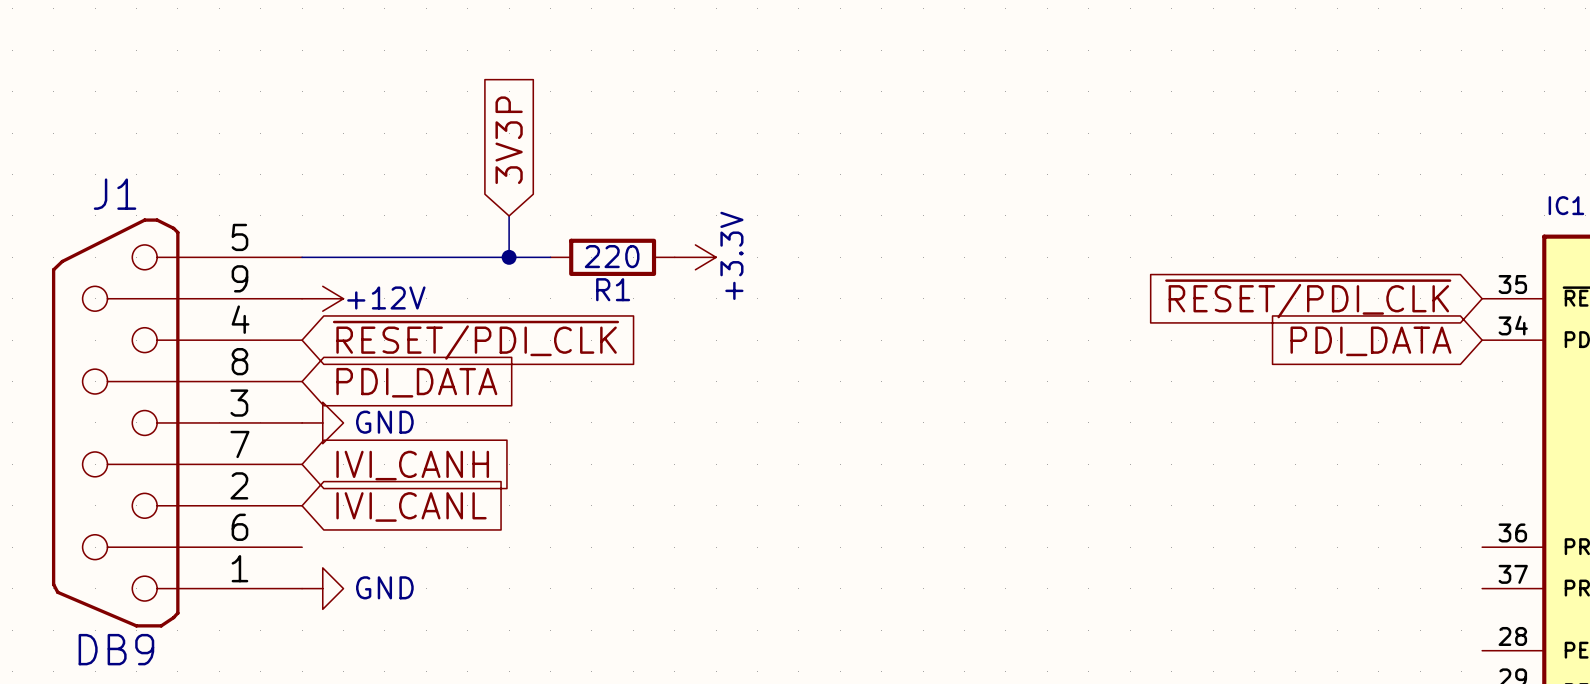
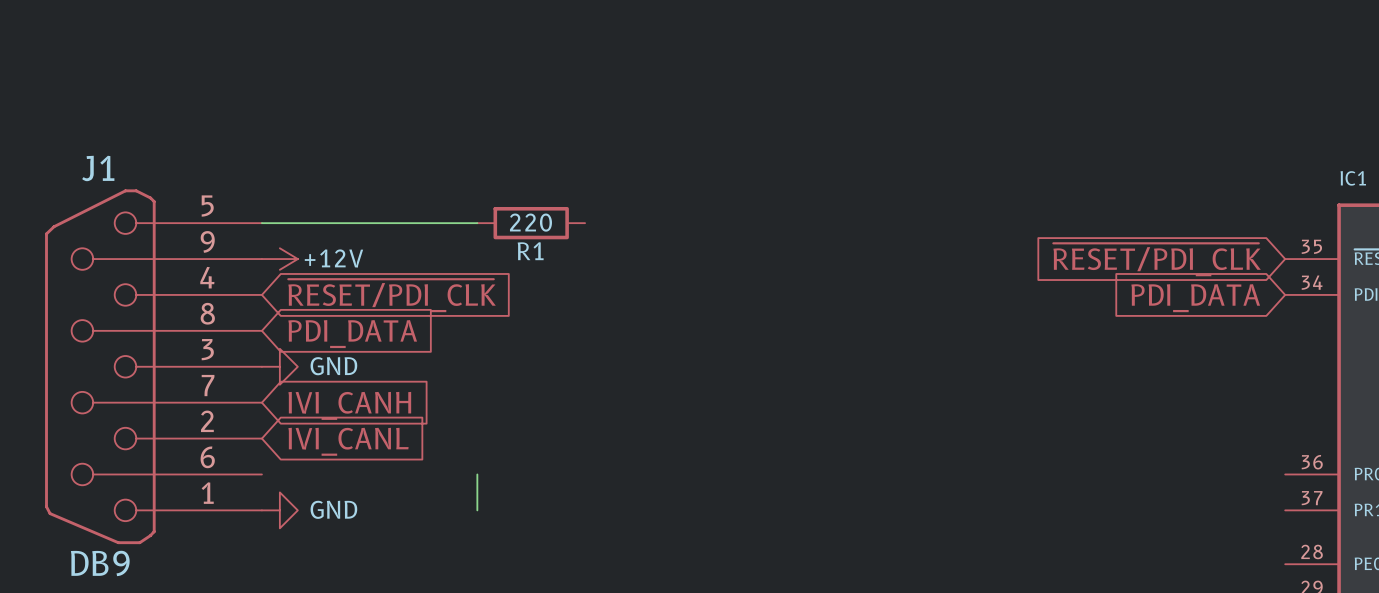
global label: 3V3P (509, 140) -> none
wire: (509, 215) (509, 257) -> (477, 474) (477, 510)
junction: (509, 257) -> none
power symbol: +3.3V (695, 257) -> none

